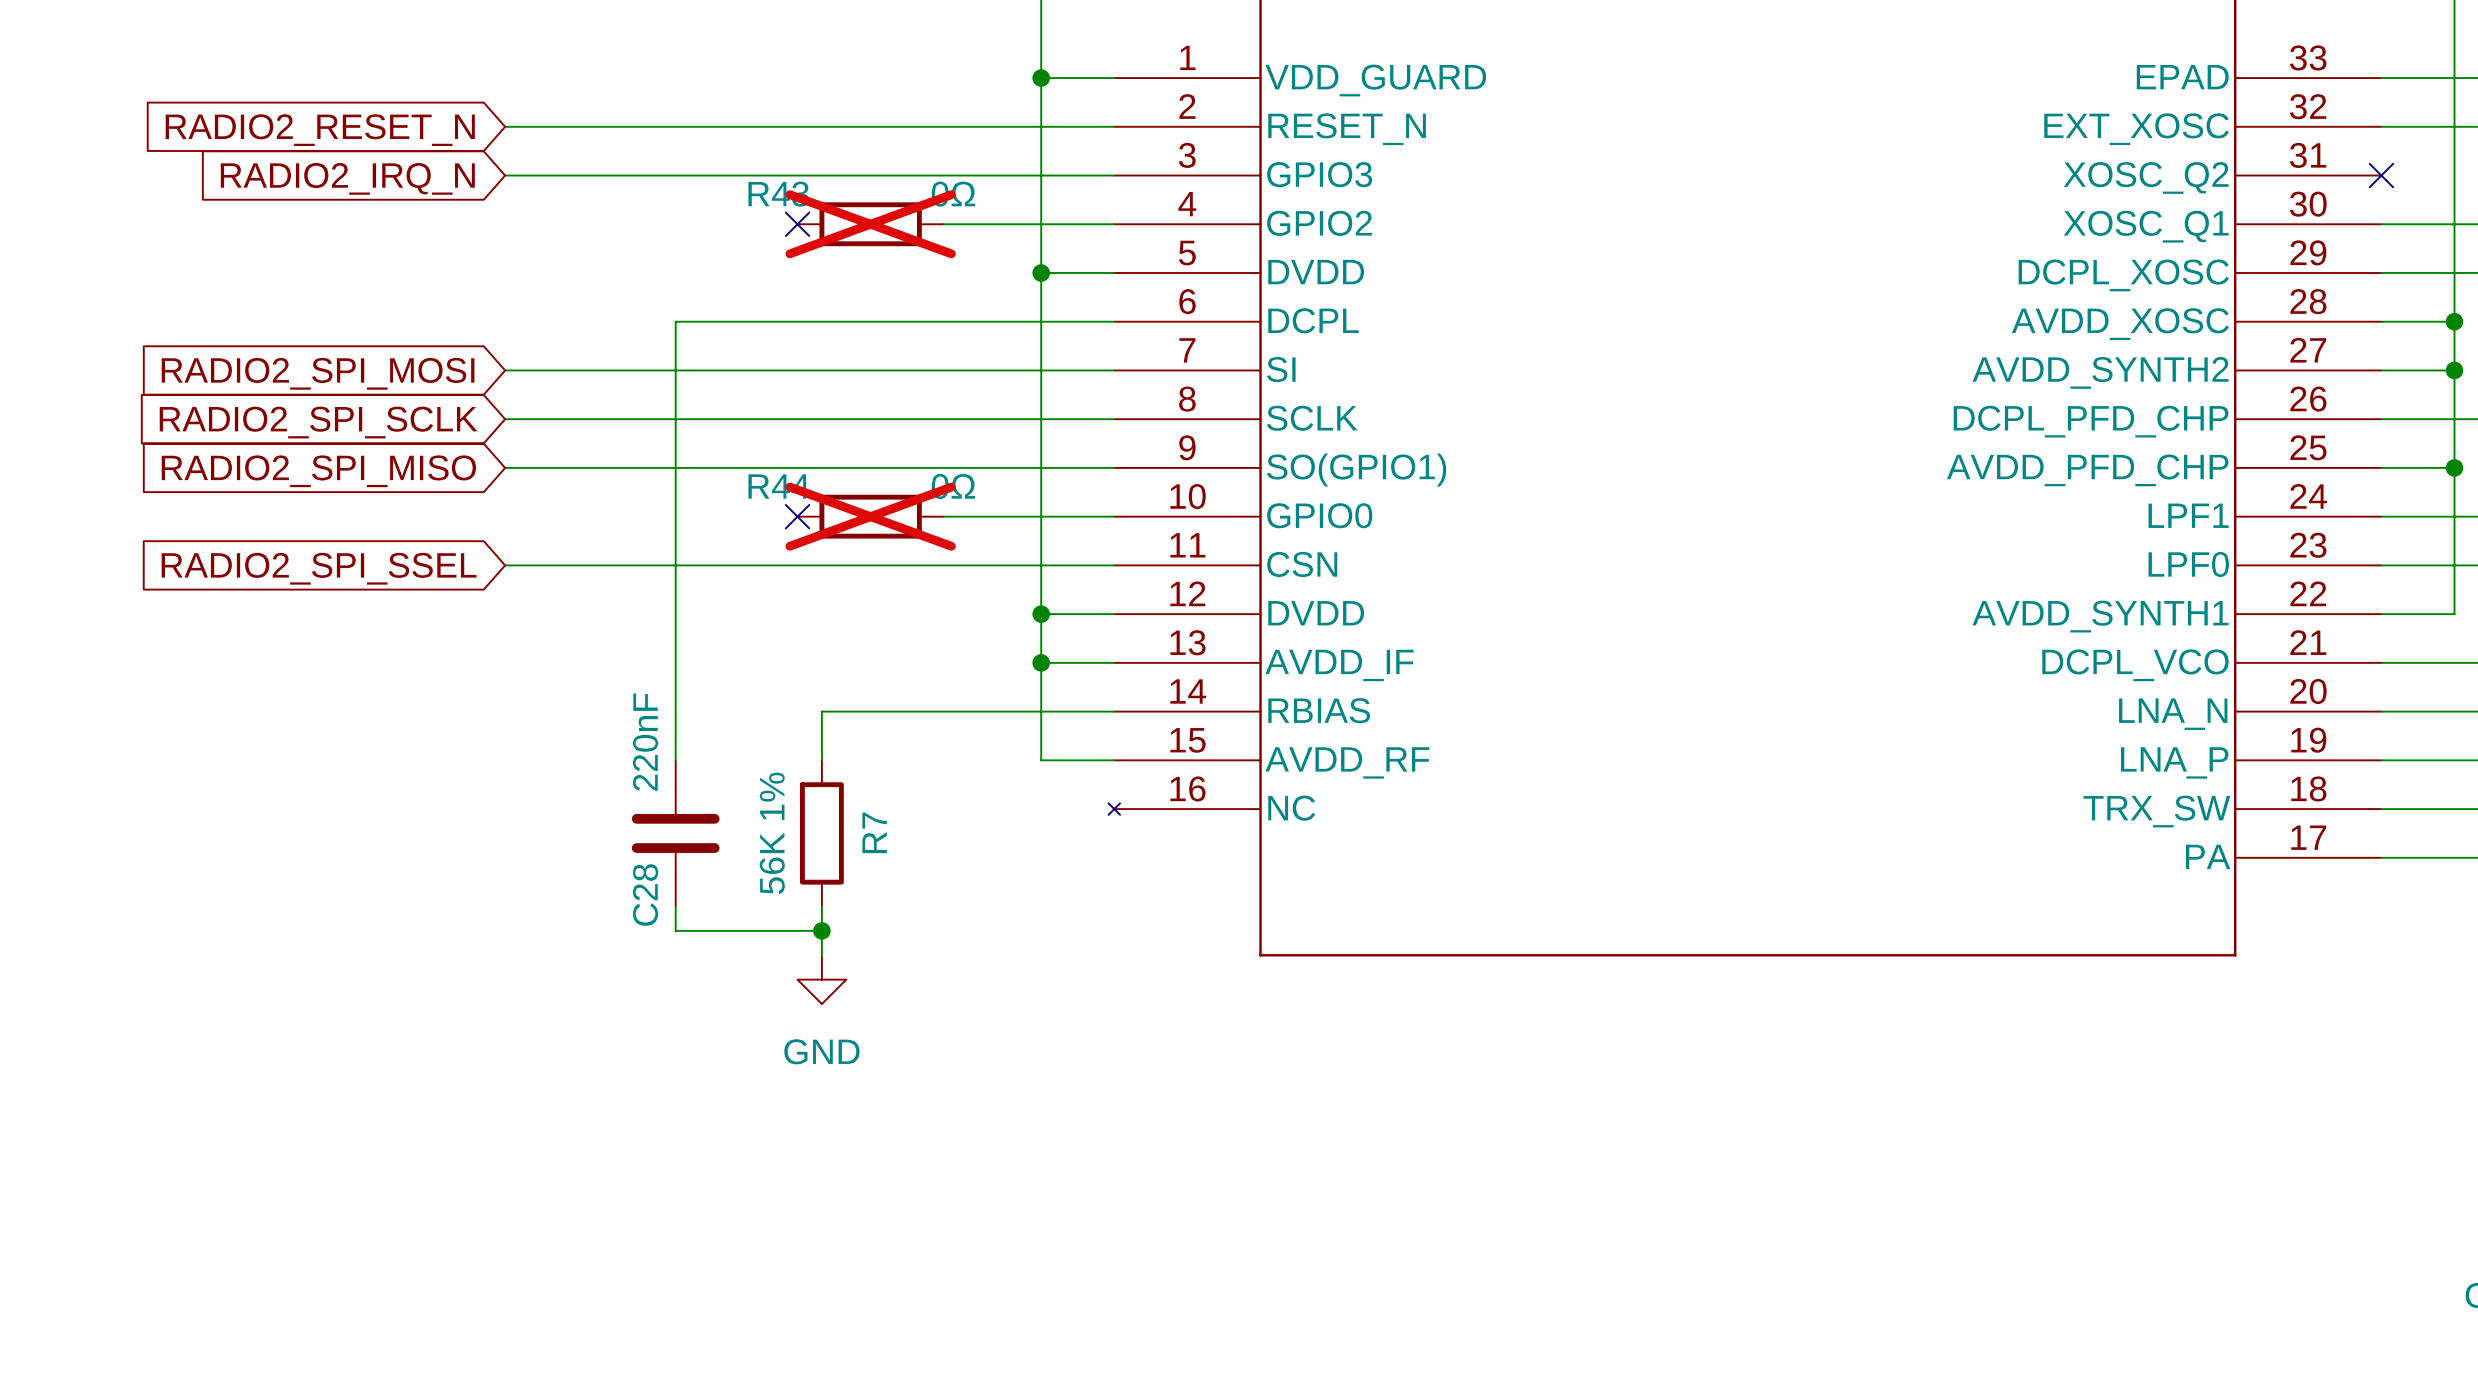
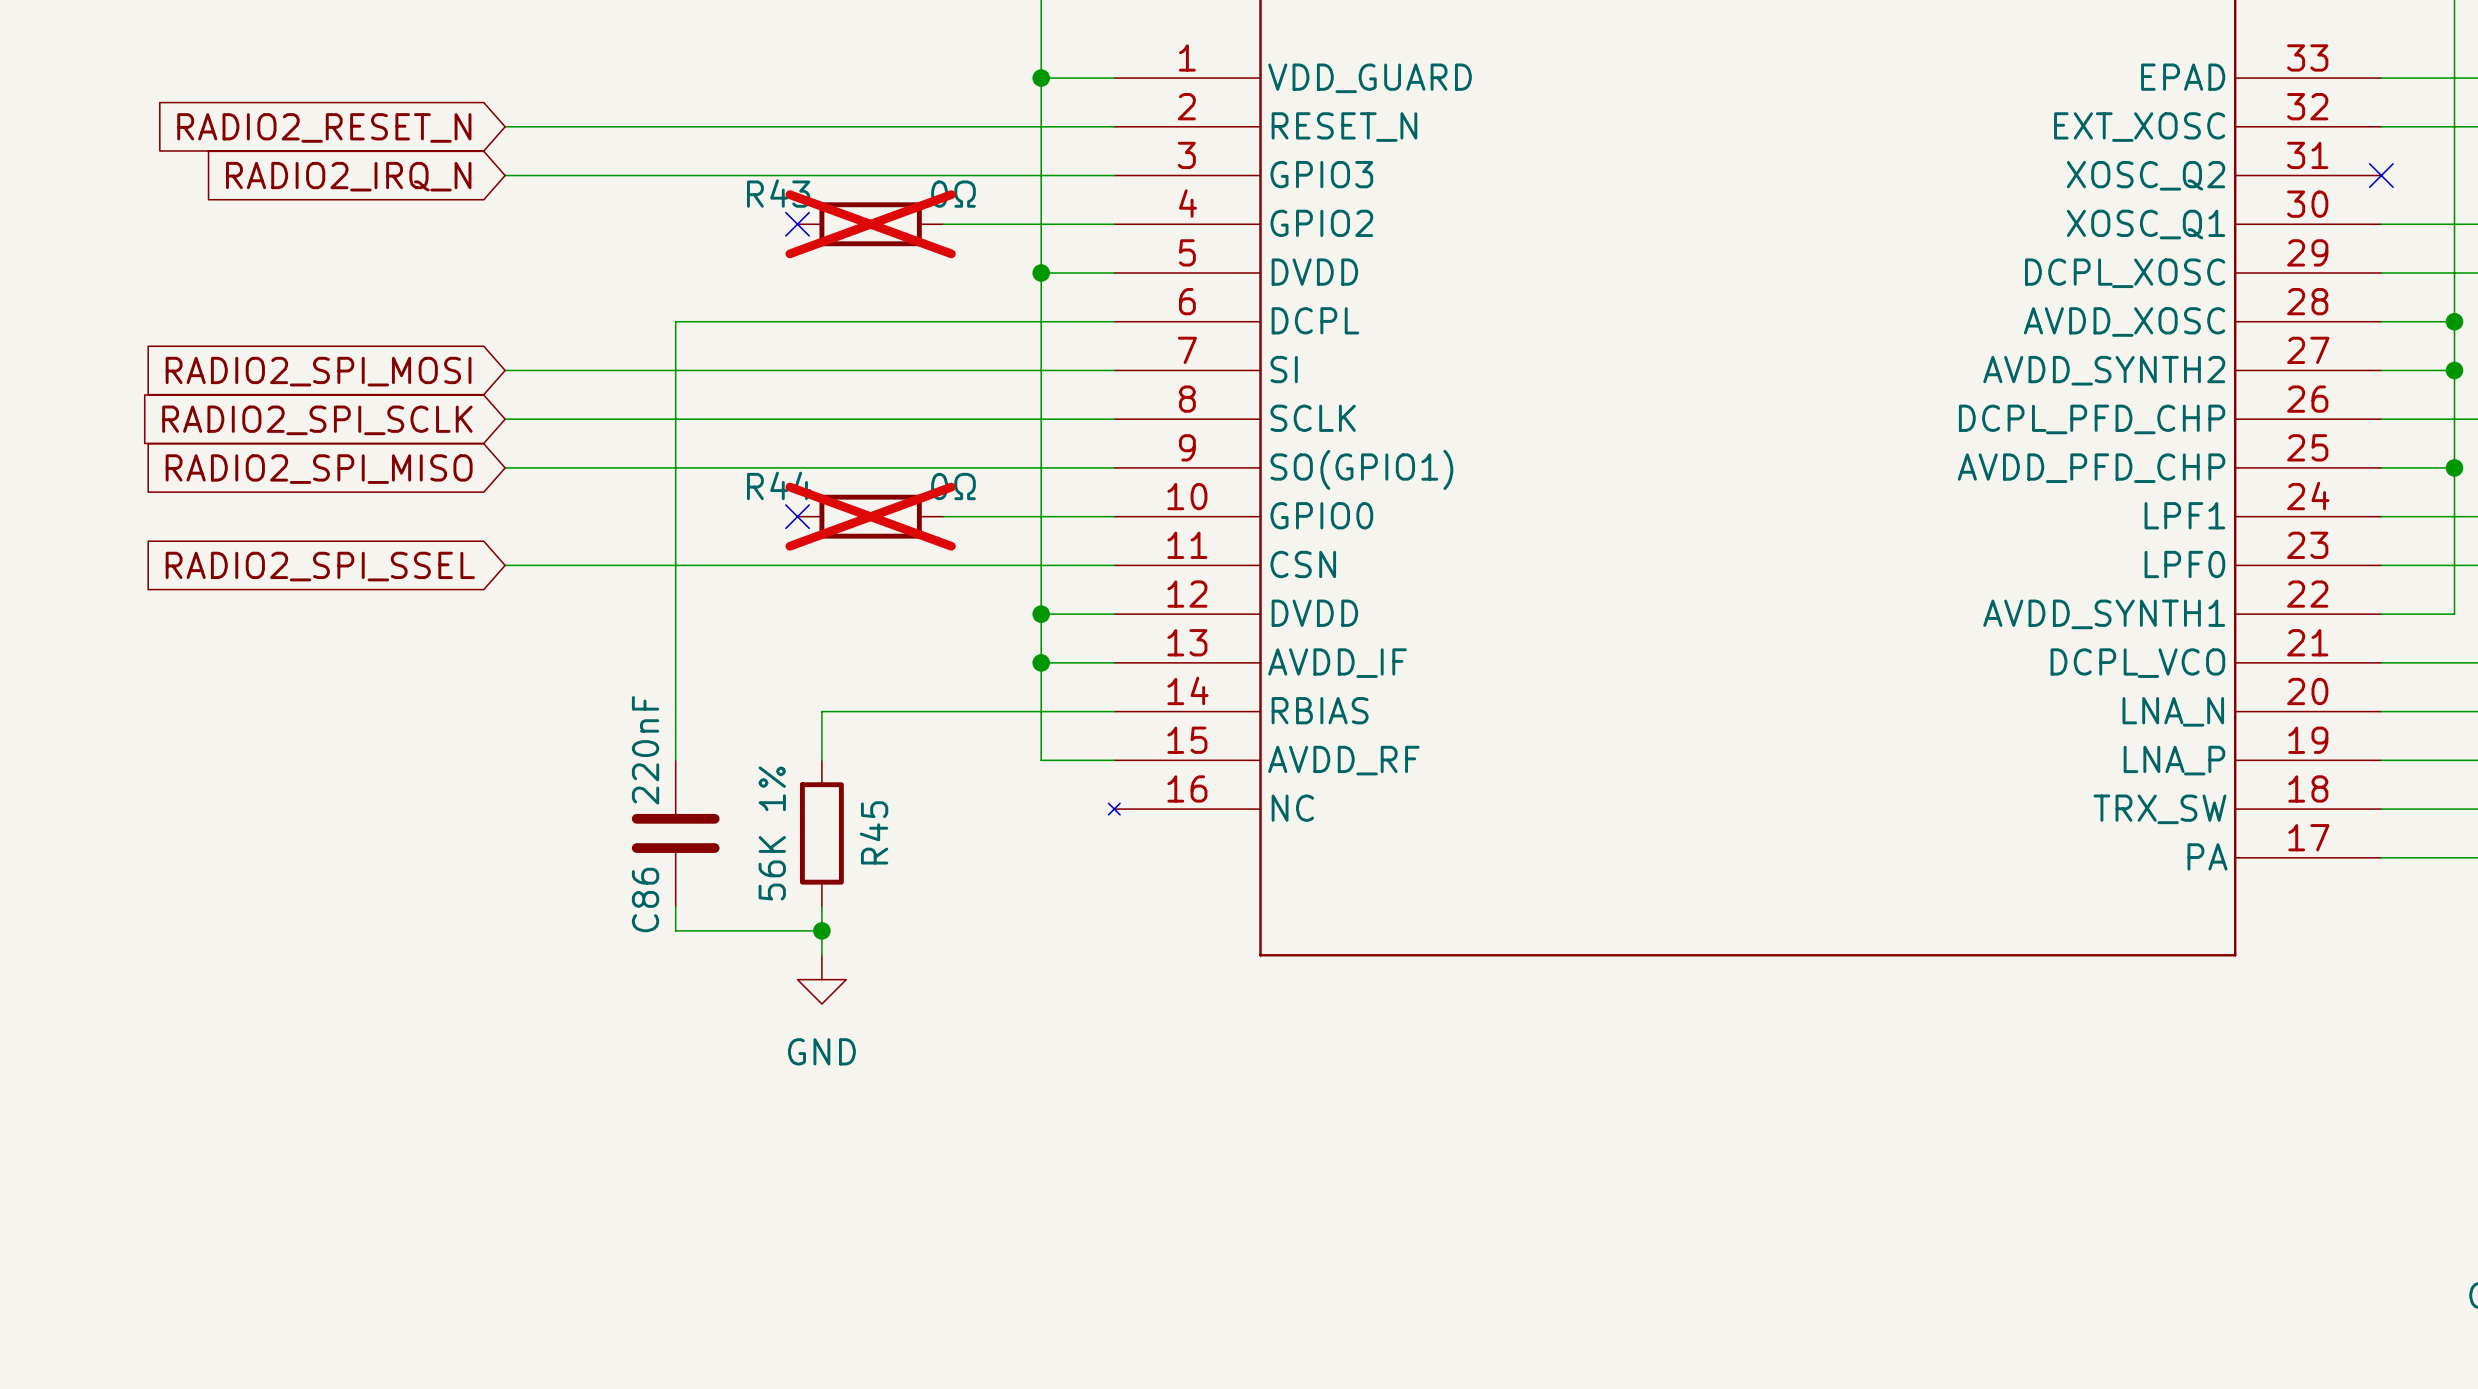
R7 name: R7 (874, 832) -> R45 (874, 832)
C28 name: C28 (645, 895) -> C86 (645, 899)

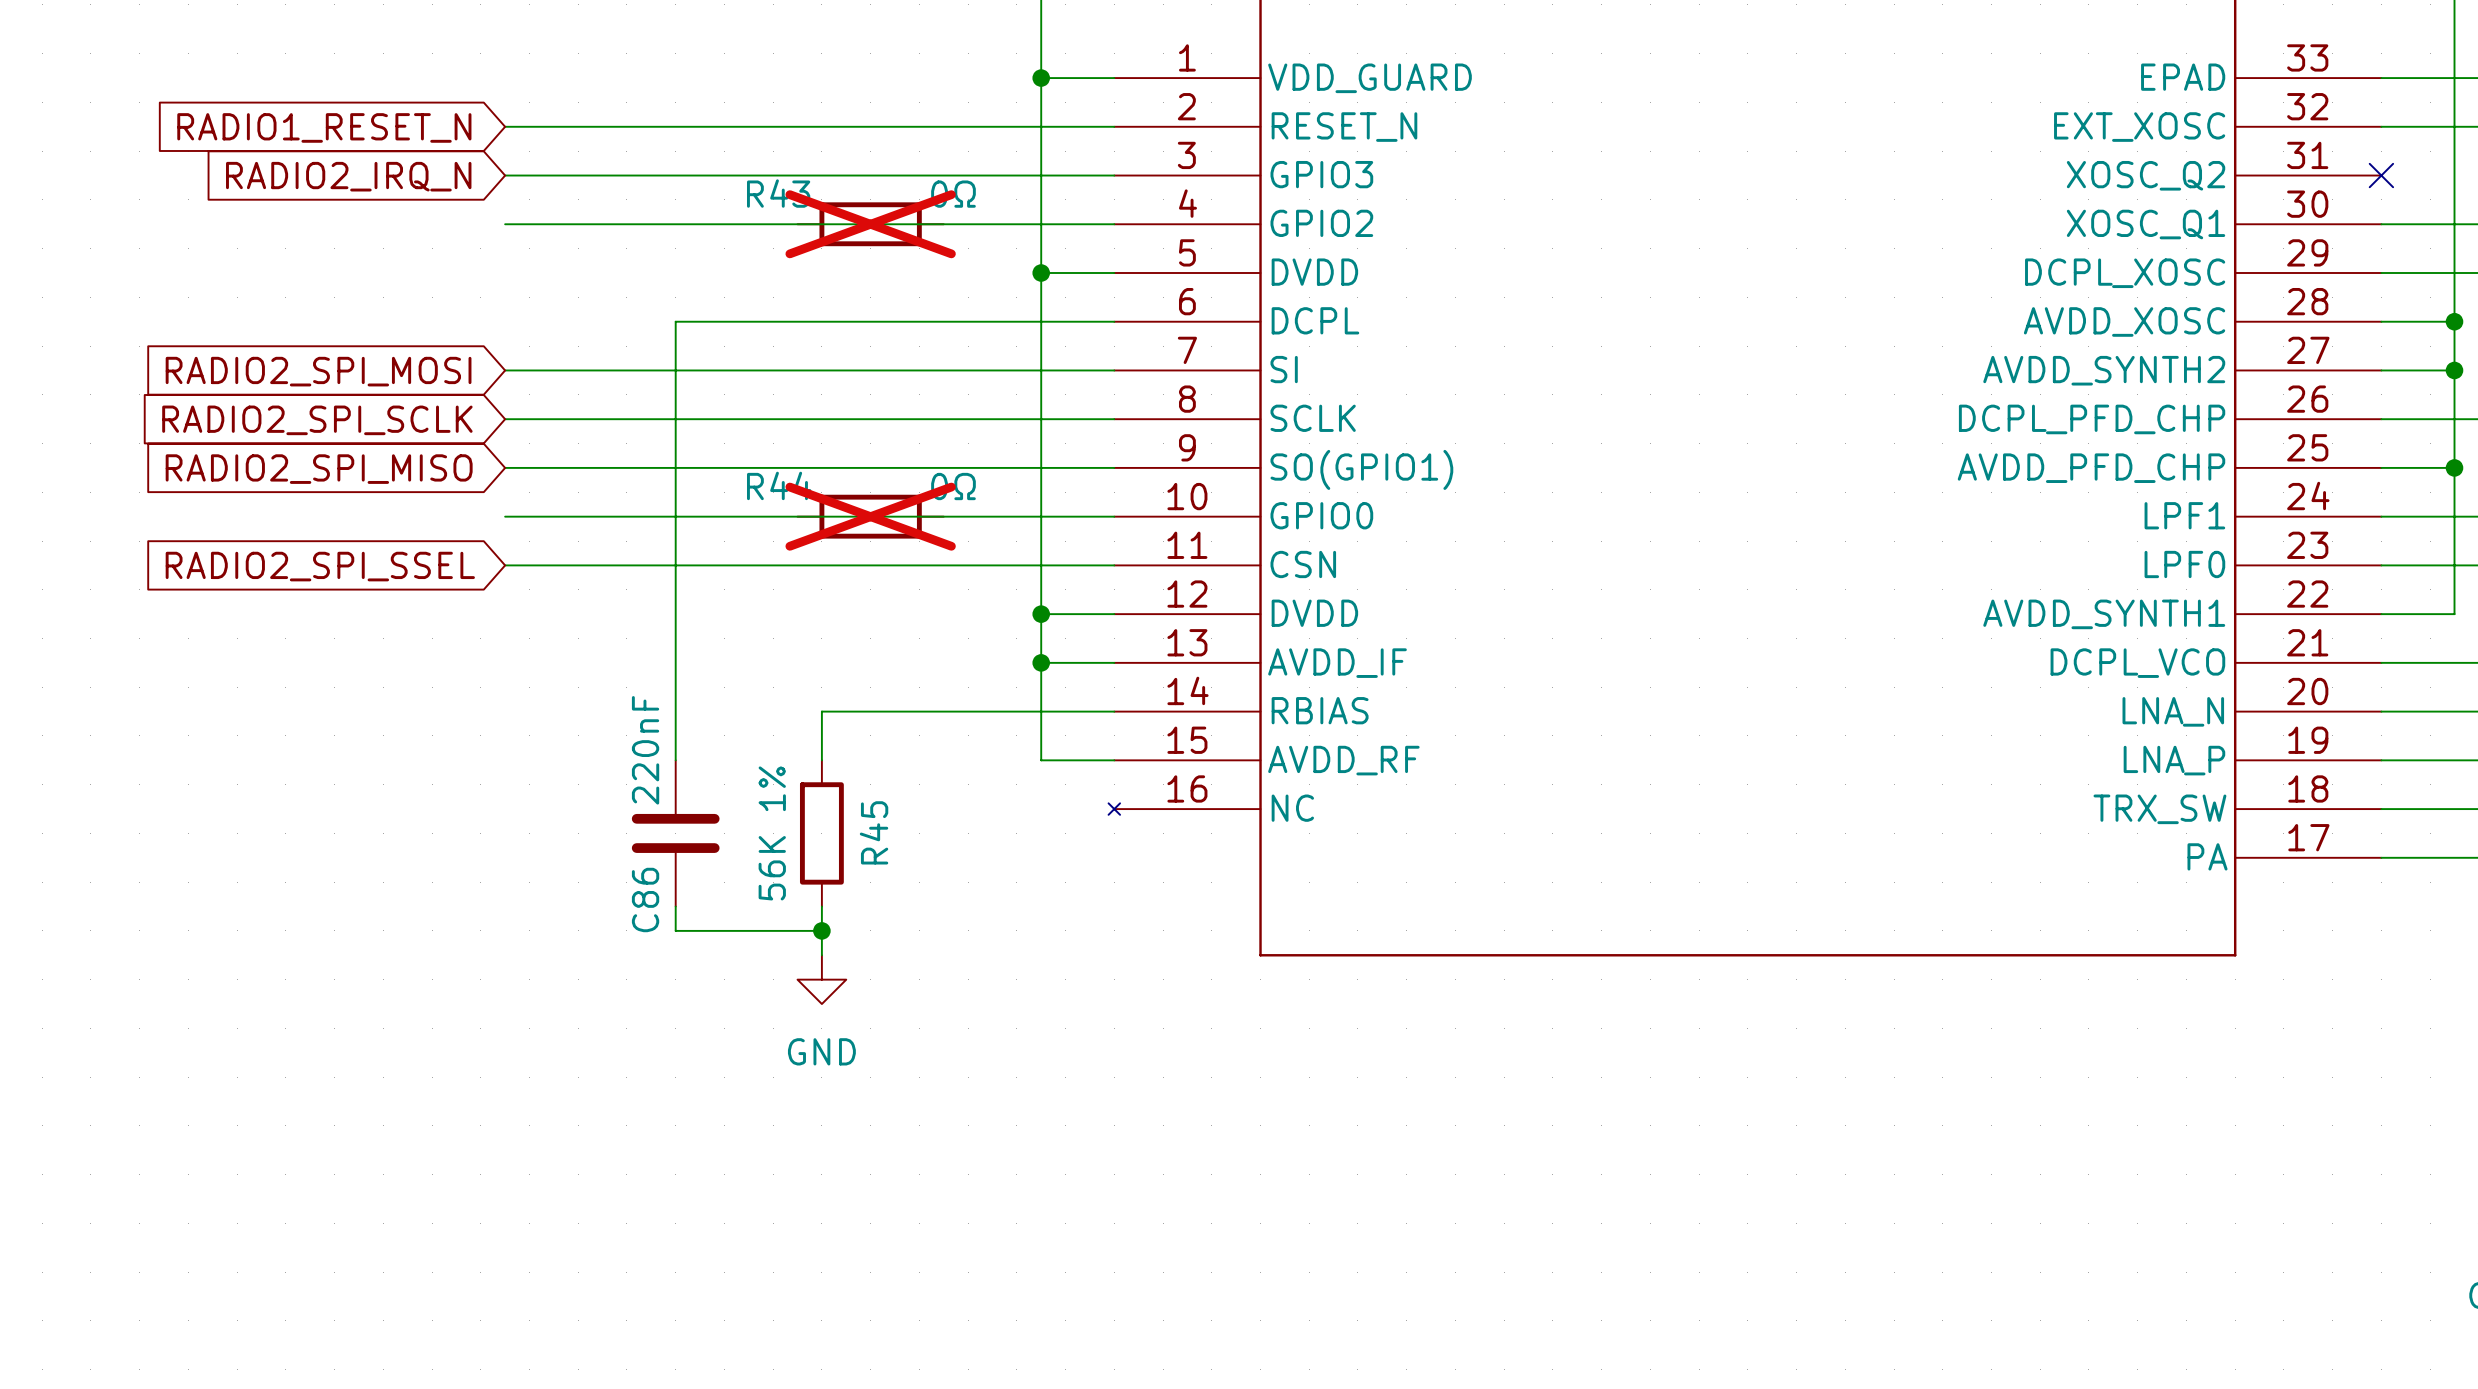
global label: RADIO2_RESET_N (324, 127) -> RADIO1_RESET_N (324, 127)
wire: none -> (505, 224) (943, 224)
no-connect mark: (797, 224) -> none
wire: none -> (505, 516) (943, 516)
no-connect mark: (797, 516) -> none

